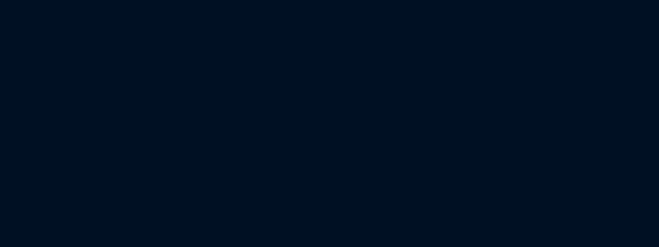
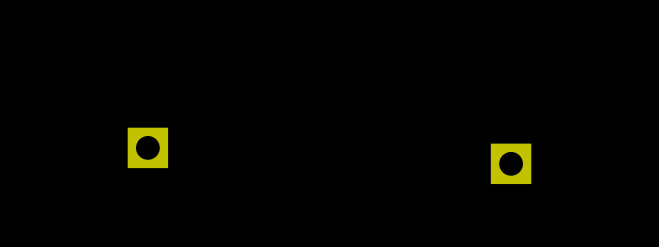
part: none -> (147, 147)
part: none -> (511, 163)

